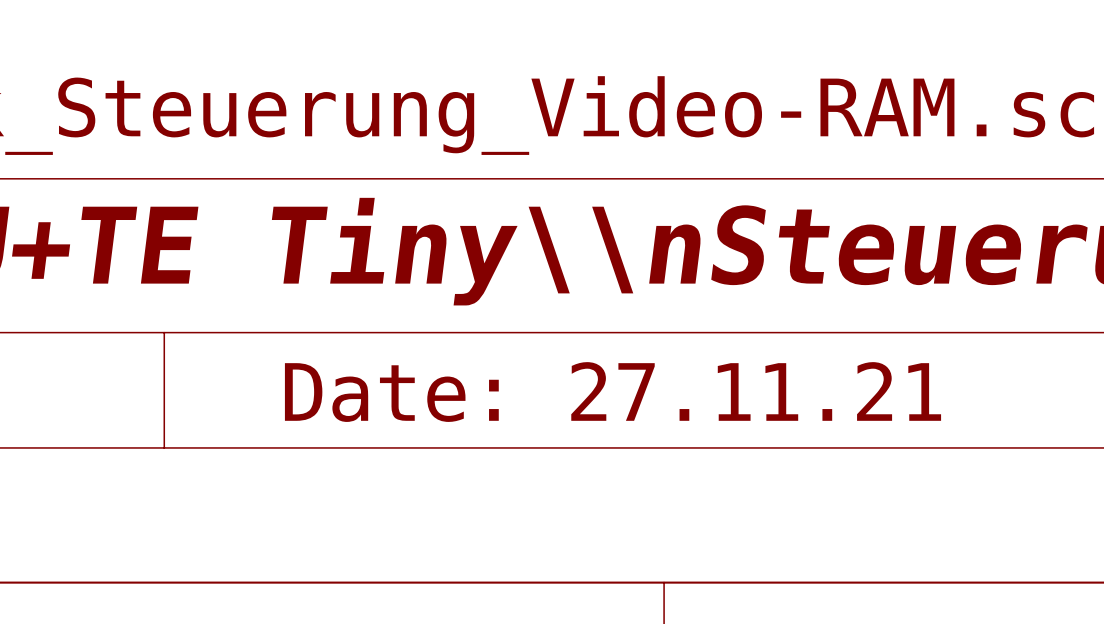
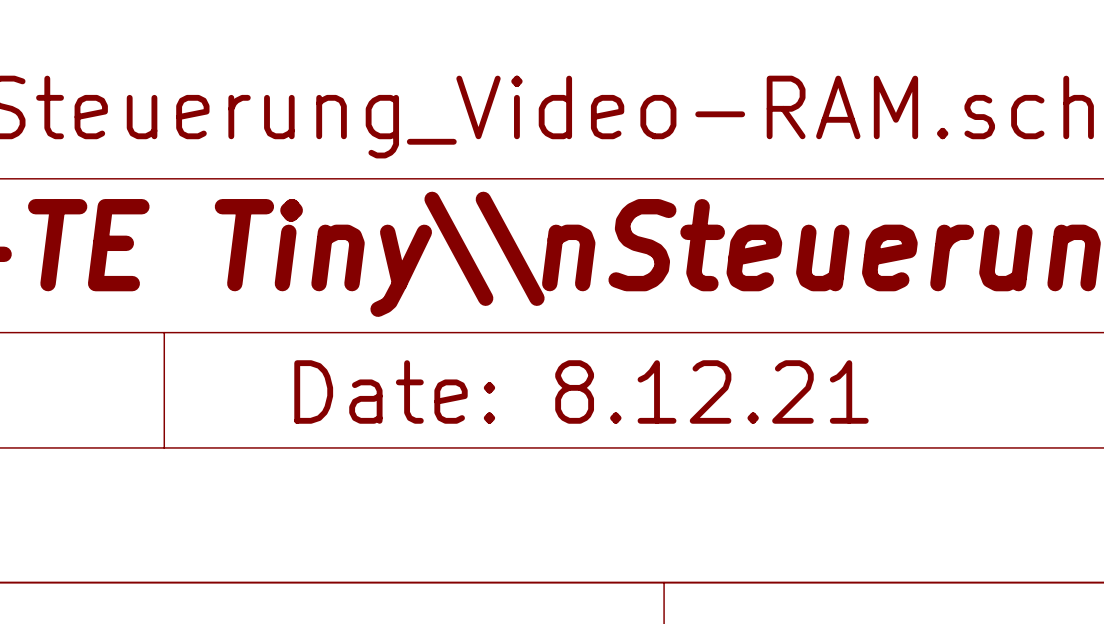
title block: Date: 27.11.21 (613, 392) -> Date: 8.12.21 (581, 391)

